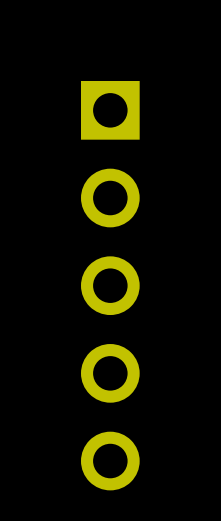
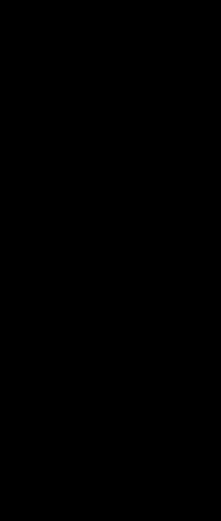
part: (110, 285) -> none

